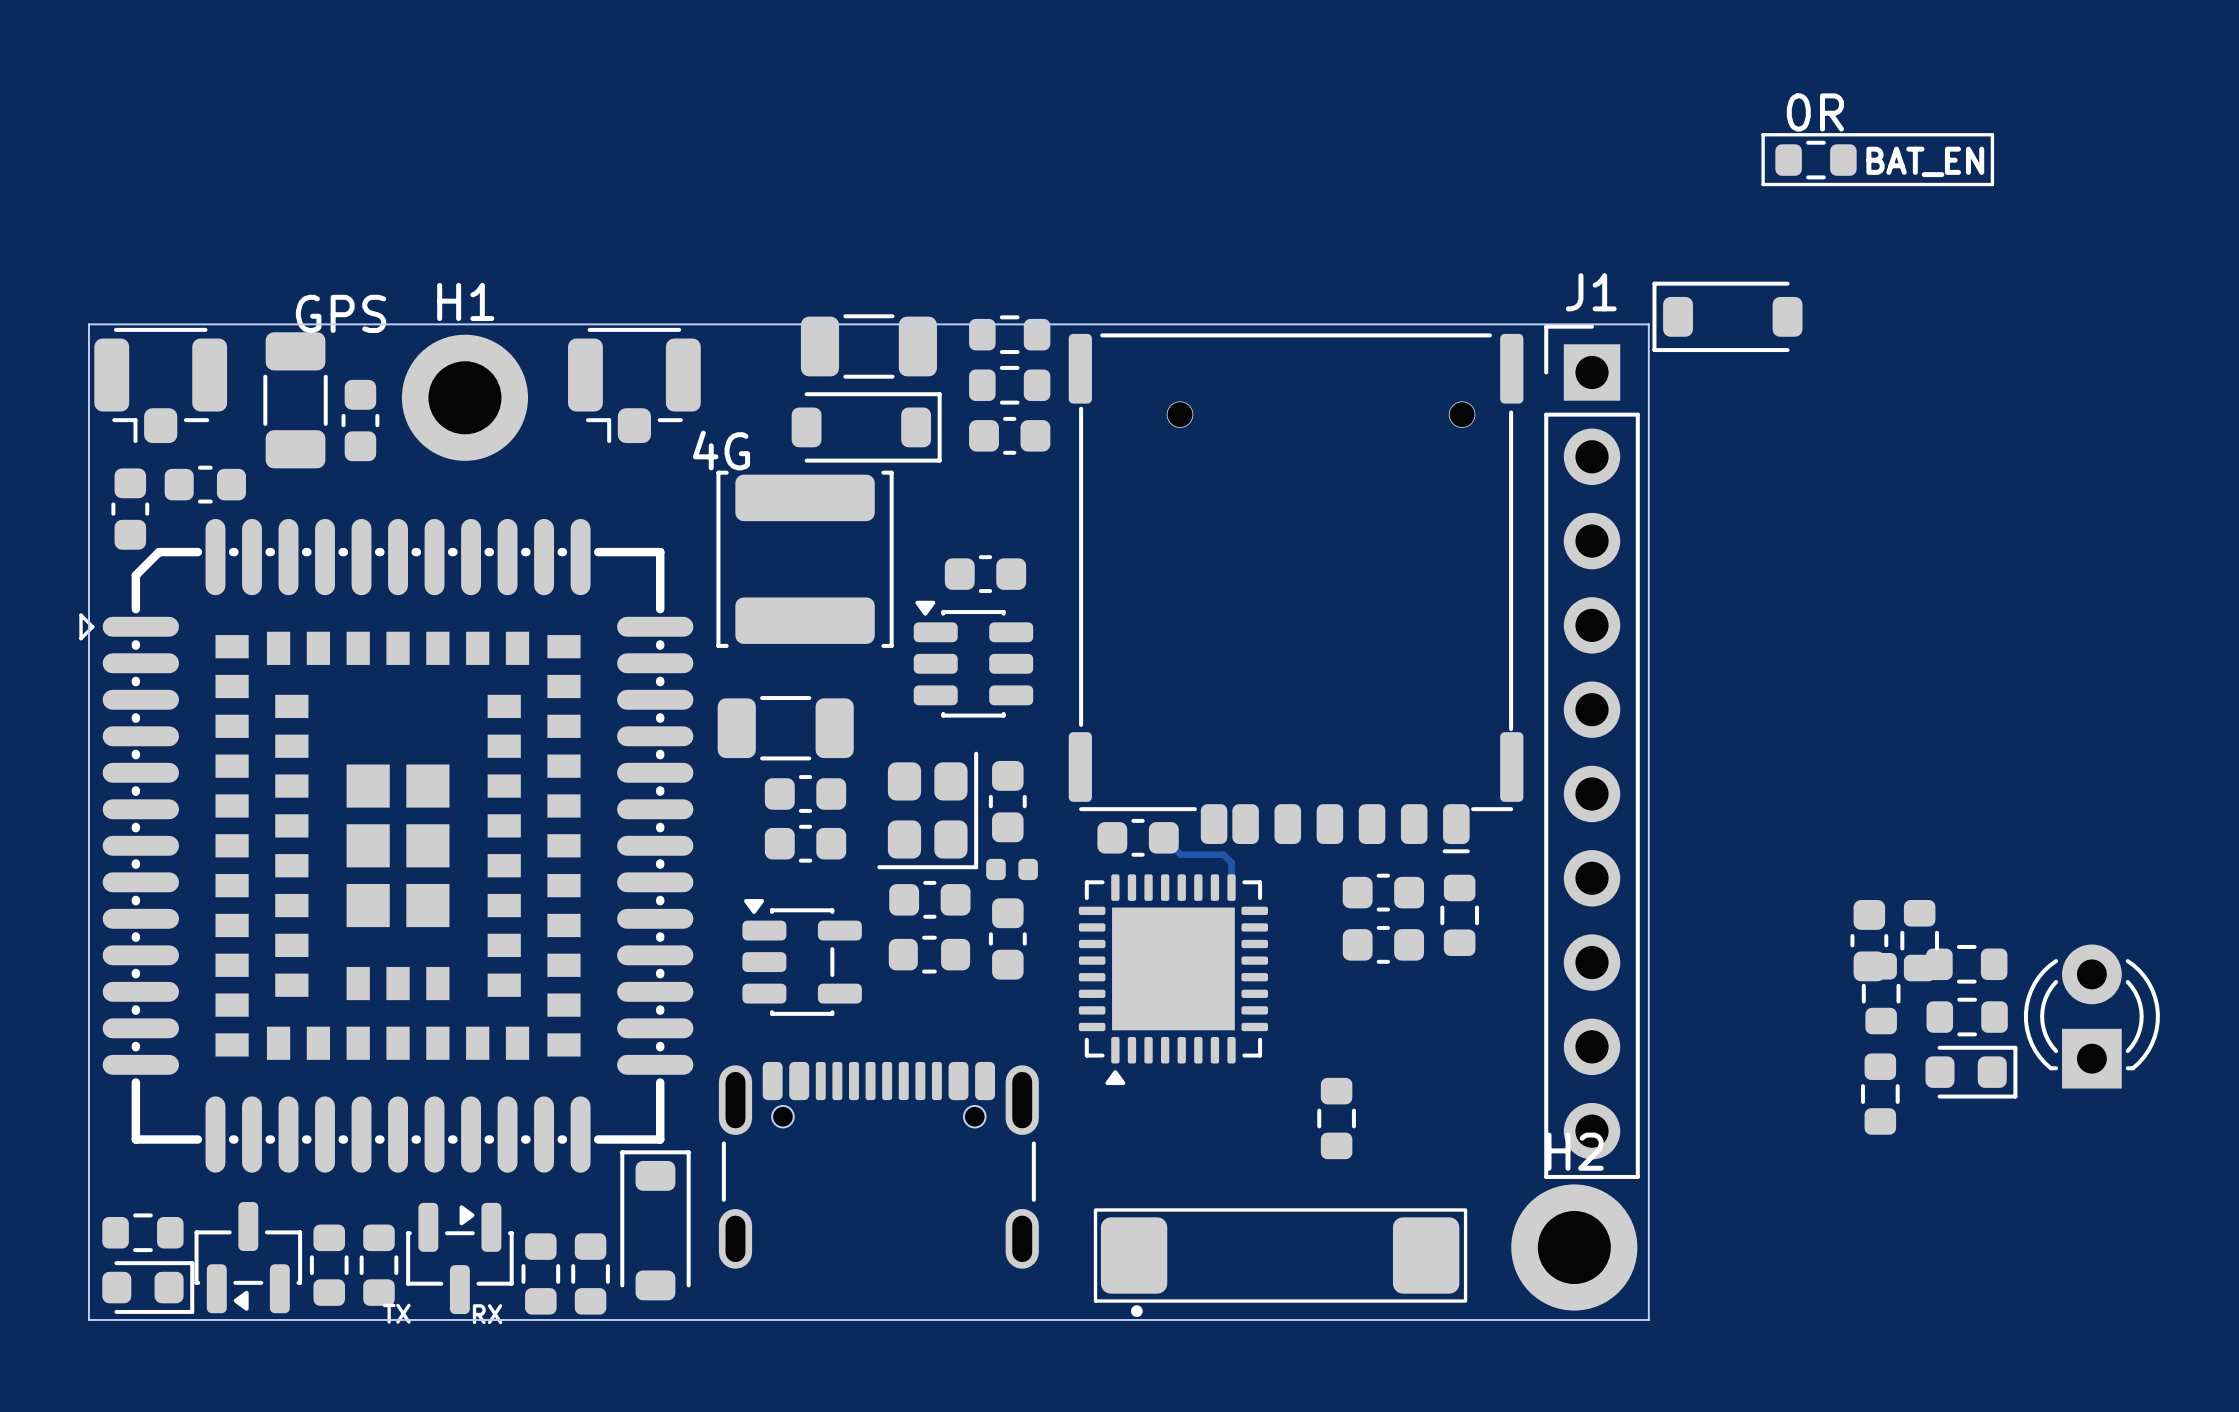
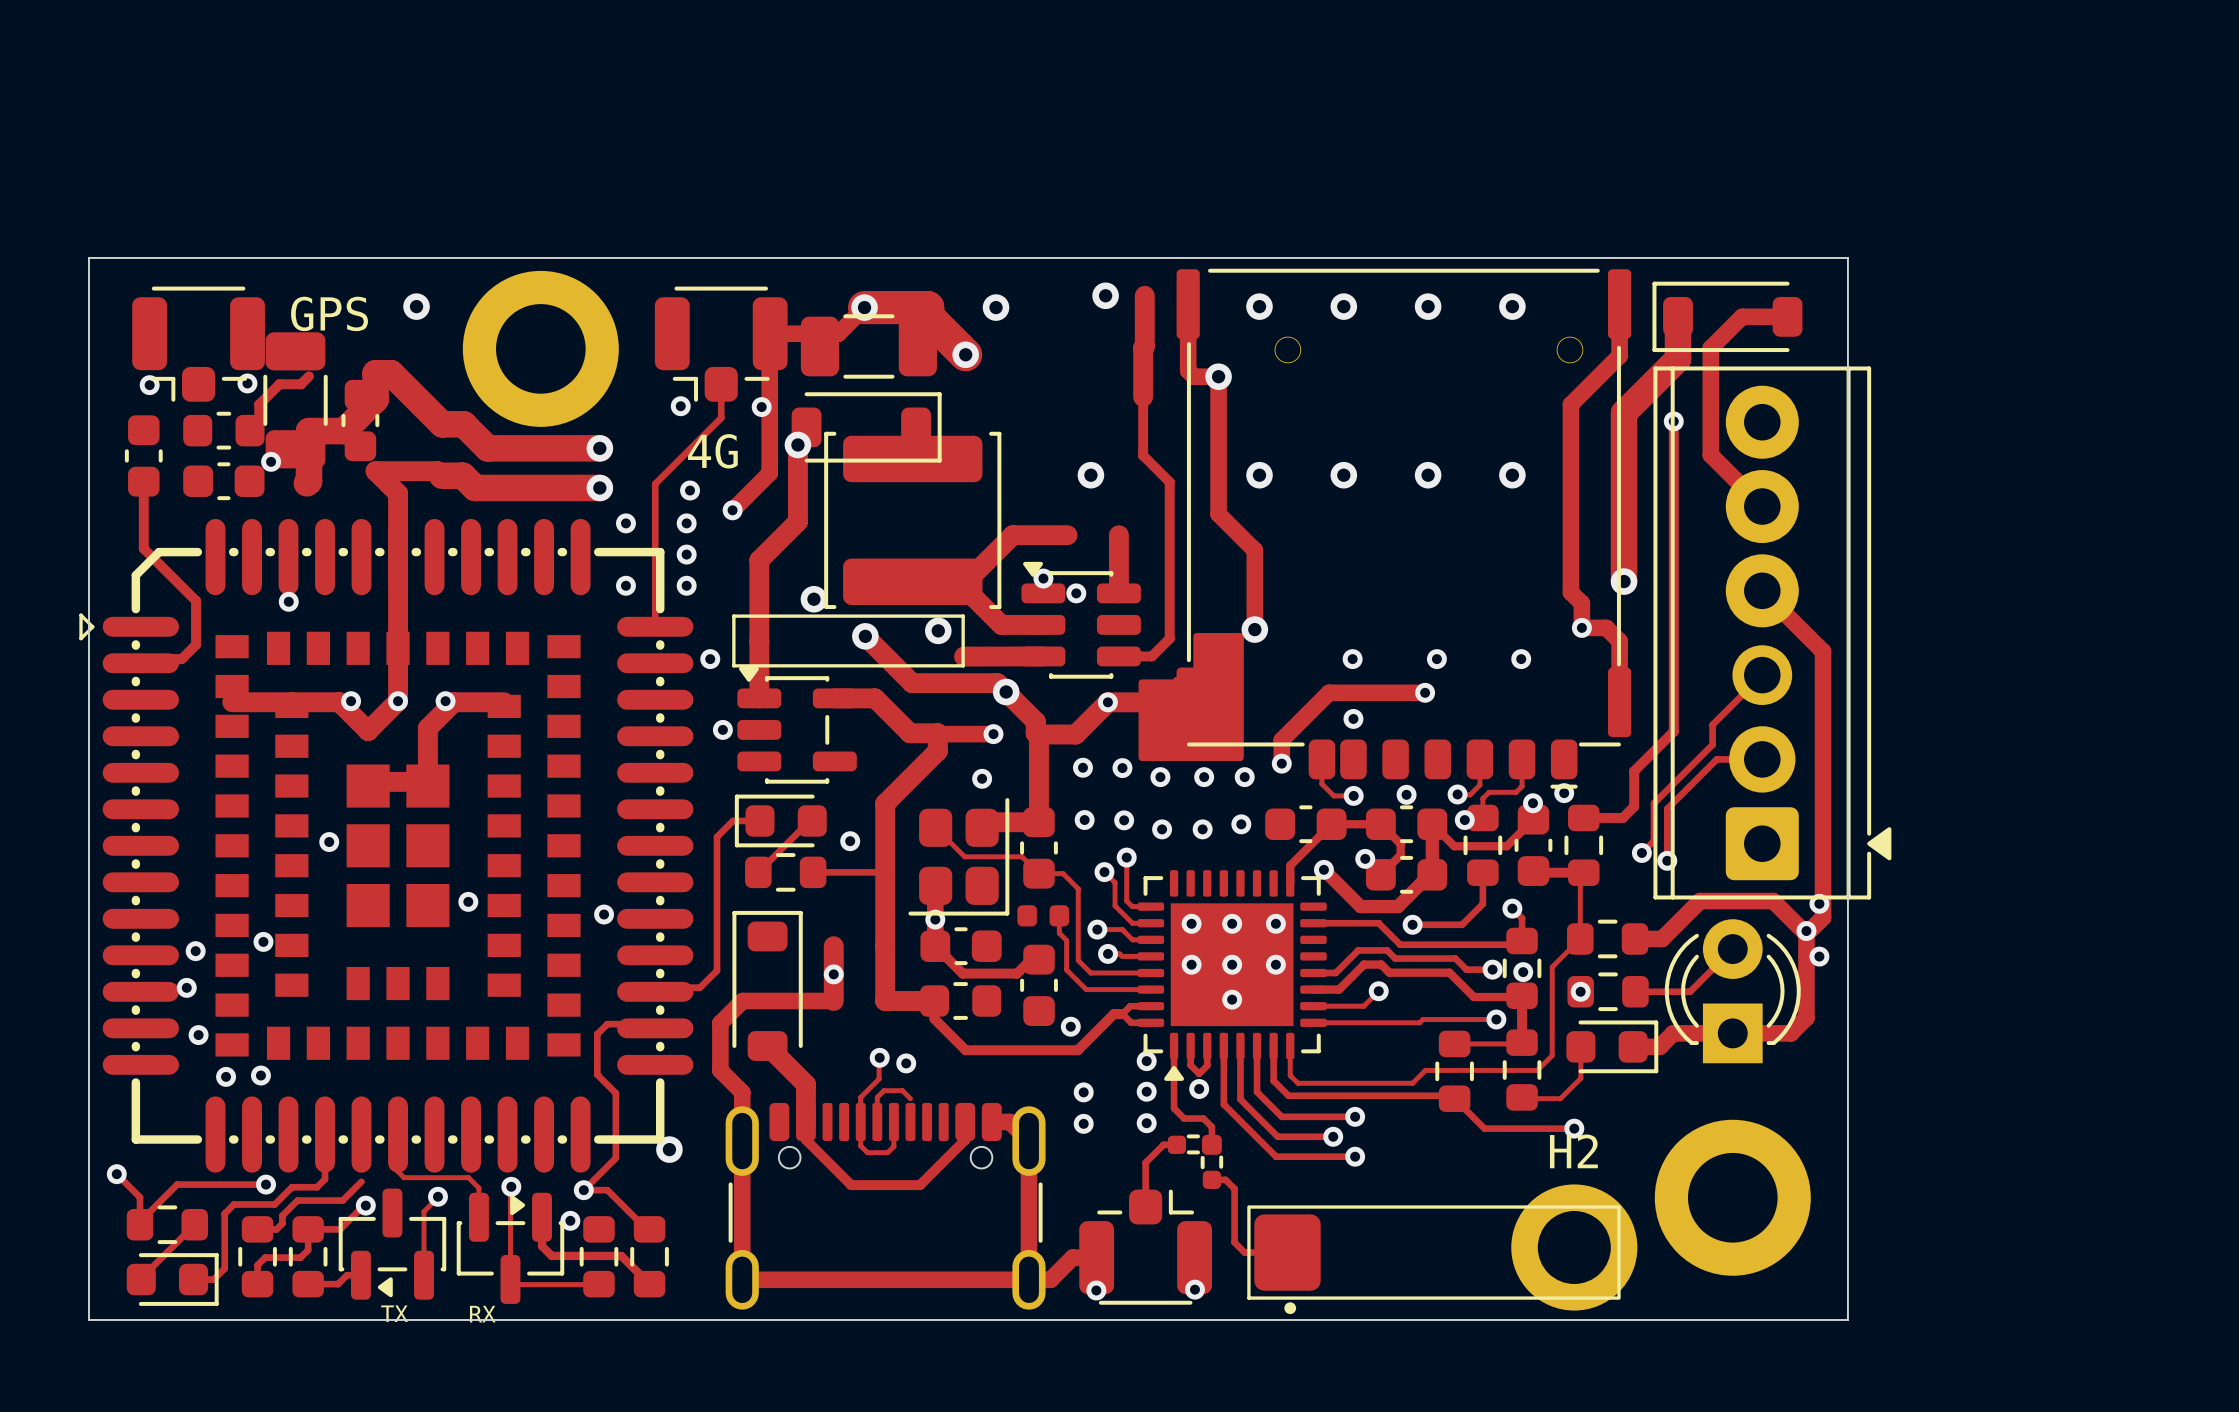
line: (1763, 134) (1992, 134) (1992, 184) (1763, 184) (1763, 134) -> none
part: 0R (1815, 160) -> none
text: BAT_EN (1925, 161) -> none
via: none -> (1105, 295)
track: none -> (1144, 295) (1143, 455) (1169, 482) (1169, 638) (1151, 656) (1118, 656)
track: none -> (1188, 304) (1188, 370) (1194, 376) (1218, 376) (1218, 514) (1254, 550) (1254, 629)
track: none -> (1619, 304) (1619, 355) (1570, 404) (1570, 592) (1581, 603) (1581, 627) (1606, 627) (1619, 641) (1619, 702)
via: none -> (416, 306)
via: none -> (1259, 306)
via: none -> (1343, 306)
via: none -> (1428, 306)
via: none -> (1512, 306)
via: none -> (864, 307)
via: none -> (996, 307)
track: none -> (1678, 316) (1678, 358) (1624, 412) (1624, 581)
track: none -> (1787, 316) (1742, 316) (1710, 348) (1710, 455) (1762, 506)
board edge: (88, 324) (1648, 324) (1648, 1319) -> (88, 324) (88, 257) (1847, 257) (1847, 1319) (1648, 1319)
part: (1009, 334) -> none
part: none -> (540, 348)
track: none -> (965, 354) (927, 316) (927, 307) (864, 307) (838, 333) (770, 333) (769, 473) (732, 510)
via: none -> (965, 354)
track: none -> (309, 376) (301, 384) (279, 384) (259, 404) (259, 421) (250, 430)
via: none -> (1218, 376)
via: none -> (247, 383)
track: none -> (721, 384) (721, 418) (655, 483) (655, 622)
via: none -> (149, 385)
part position: (160, 385) -> (198, 344)
part position: (634, 385) -> (721, 344)
part: (1009, 385) -> none
H1: (464, 397) -> none
via: none -> (680, 406)
via: none -> (761, 407)
track: none -> (1673, 421) (1673, 731) (1634, 771) (1634, 806) (1622, 817) (1601, 817)
via: none -> (1673, 421)
part: none -> (223, 430)
part: (1009, 435) -> none
track: none -> (797, 444) (797, 521) (759, 560) (759, 698)
via: none -> (797, 444)
track: none -> (599, 448) (487, 448) (463, 424) (442, 424) (391, 373) (375, 373) (375, 399) (344, 431) (309, 431) (309, 481) (306, 483)
via: none -> (599, 448)
via: none -> (271, 461)
part footprint: [164, 465, 246, 504] -> [183, 462, 265, 501]
via: none -> (1090, 475)
via: none -> (1259, 475)
via: none -> (1343, 475)
via: none -> (1428, 475)
via: none -> (1512, 475)
track: none -> (143, 481) (143, 548) (196, 600) (196, 644) (181, 659) (140, 659)
track: none -> (599, 487) (475, 487) (462, 475) (442, 475) (437, 471) (375, 471) (398, 493) (398, 701) (368, 731) (339, 702) (232, 702)
via: none -> (599, 487)
via: none -> (690, 490)
part position: (130, 509) -> (143, 455)
via: none -> (732, 510)
via: none -> (625, 523)
via: none -> (686, 523)
track: none -> (1067, 535) (1012, 535) (966, 581) (912, 581)
track: none -> (1118, 535) (1118, 593)
via: none -> (686, 554)
part position: (805, 559) -> (912, 520)
part: (985, 574) -> none
via: none -> (1043, 578)
track: none -> (958, 581) (1001, 624) (1043, 624)
via: none -> (1624, 581)
via: none -> (625, 585)
via: none -> (686, 585)
track: none -> (1762, 590) (1823, 651) (1823, 917) (1806, 934)
via: none -> (1076, 593)
part position: (1296, 593) -> (1403, 528)
via: none -> (813, 599)
via: none -> (288, 601)
line: none -> (733, 616) (963, 616) (963, 665) (733, 665) (733, 616)
via: none -> (1581, 627)
via: none -> (1254, 629)
via: none -> (938, 630)
part: none -> (1772, 632)
drawing: none -> [1138, 633, 1244, 762]
track: none -> (865, 636) (912, 683) (997, 683) (1035, 721) (1035, 733) (1038, 736) (1038, 822) (988, 822) (982, 827)
via: none -> (865, 636)
track: none -> (964, 656) (1043, 656)
via: none -> (710, 659)
part position: (973, 659) -> (1081, 620)
via: none -> (1352, 659)
via: none -> (1436, 659)
via: none -> (1521, 659)
track: none -> (1762, 675) (1712, 724) (1712, 744) (1653, 803) (1653, 840) (1641, 852)
via: none -> (1006, 691)
track: none -> (1425, 692) (1329, 692) (1281, 740) (1281, 763)
via: none -> (1425, 692)
part footprint: [717, 696, 854, 761] -> [737, 666, 857, 784]
track: none -> (834, 698) (875, 698) (910, 733) (937, 733)
via: none -> (351, 701)
via: none -> (398, 701)
via: none -> (445, 701)
track: none -> (504, 702) (453, 702) (427, 728) (427, 781) (368, 781)
via: none -> (1107, 702)
track: none -> (1188, 702) (1107, 702) (1075, 734) (1036, 734)
via: none -> (1353, 718)
via: none -> (722, 729)
track: none -> (937, 733) (937, 751) (885, 803) (885, 1000) (934, 1000) (934, 1019) (965, 1050) (1077, 1050) (1114, 1013) (1122, 1013)
track: none -> (937, 733) (993, 734)
via: none -> (993, 734)
J1: (1592, 751) -> none
track: none -> (1321, 759) (1321, 783) (1333, 795) (1353, 795)
track: none -> (1479, 759) (1479, 785) (1470, 794) (1458, 794)
track: none -> (1522, 759) (1522, 786) (1516, 792) (1489, 792) (1482, 798) (1482, 817) (1479, 820) (1464, 820)
track: none -> (1762, 759) (1716, 759) (1667, 808) (1667, 860)
via: none -> (1281, 763)
via: none -> (1082, 767)
via: none -> (1122, 768)
via: none -> (1160, 777)
via: none -> (1204, 777)
via: none -> (1244, 777)
via: none -> (982, 778)
part: (805, 793) -> none
via: none -> (1564, 793)
via: none -> (1406, 794)
via: none -> (1457, 794)
via: none -> (1353, 795)
part: (1007, 801) -> none
track: none -> (1533, 803) (1533, 819) (1506, 846) (1454, 846) (1432, 824) (1432, 874) (1429, 874) (1397, 906) (1360, 906) (1323, 869)
via: none -> (1533, 803)
part position: (927, 810) -> (958, 856)
track: none -> (760, 820) (733, 820) (717, 836) (717, 970) (700, 987) (655, 987)
part: none -> (780, 820)
track: none -> (812, 820) (809, 820) (758, 872)
via: none -> (1084, 820)
via: none -> (1124, 820)
via: none -> (1464, 820)
via: none -> (1241, 824)
part: none -> (1305, 824)
part: none -> (1406, 824)
track: none -> (935, 827) (964, 856) (1022, 856) (1038, 873) (1063, 873) (1078, 888) (1078, 960) (1090, 973) (1150, 973)
via: none -> (1162, 829)
via: none -> (1202, 829)
part: (1138, 837) -> none
track: (1163, 837) (1180, 854) (1223, 854) (1231, 862) (1231, 887) -> none
via: none -> (850, 841)
via: none -> (329, 842)
part: (805, 843) -> none
part: none -> (1482, 845)
part: none -> (1533, 845)
part: none -> (1583, 845)
part: none -> (1038, 847)
via: none -> (1641, 852)
track: none -> (1126, 857) (1126, 901) (1132, 906) (1150, 906)
via: none -> (1126, 857)
via: none -> (1365, 858)
via: none -> (1667, 860)
part position: (1012, 869) -> (1043, 915)
via: none -> (1323, 869)
track: none -> (1533, 871) (1535, 872) (1583, 872) (1580, 876) (1580, 938) (1552, 967) (1552, 1055) (1537, 1070) (1425, 1070) (1412, 1083) (1297, 1083) (1290, 1075) (1290, 1046)
part: none -> (785, 872)
track: none -> (813, 872) (885, 872)
track: none -> (1104, 872) (1115, 882) (1115, 905) (1132, 923) (1150, 923)
via: none -> (1104, 872)
track: none -> (1482, 872) (1482, 903) (1462, 924) (1412, 924)
track: none -> (1380, 874) (1400, 855) (1400, 844) (1380, 824) (1331, 824) (1290, 865) (1290, 883)
track: none -> (935, 886) (935, 946) (962, 973) (1017, 973) (1031, 959) (1039, 959)
part position: (1383, 892) -> (1406, 874)
part: (929, 899) -> none
via: none -> (468, 901)
via: none -> (1819, 903)
track: none -> (1512, 908) (1522, 918) (1522, 940) (1518, 944) (1400, 944) (1378, 923) (1313, 923)
via: none -> (1512, 908)
via: none -> (604, 914)
track: none -> (1059, 915) (1059, 933) (1066, 940) (1066, 969) (1086, 989) (1150, 989)
part: (1459, 915) -> none
via: none -> (935, 919)
via: none -> (1191, 923)
via: none -> (1232, 923)
via: none -> (1275, 923)
via: none -> (1412, 924)
track: none -> (1097, 929) (1122, 929) (1132, 939) (1150, 939)
via: none -> (1097, 929)
via: none -> (1806, 931)
track: none -> (1806, 934) (1773, 901) (1700, 901) (1662, 938) (1635, 938)
track: none -> (1806, 934) (1806, 1017) (1790, 1033) (1673, 1033) (1659, 1046) (1633, 1046)
part: (1007, 938) -> none
part: none -> (1607, 938)
part: (1869, 940) -> none
part: (1919, 940) -> none
via: none -> (263, 941)
part: (1383, 944) -> none
track: none -> (833, 946) (833, 1000) (742, 1000) (720, 1023) (720, 1070) (742, 1092) (742, 1279) (1050, 1279) (1072, 1257) (1096, 1257) (1096, 1290)
part: none -> (961, 946)
track: none -> (1732, 949) (1690, 991) (1635, 991)
via: none -> (195, 951)
track: none -> (1108, 953) (1119, 953) (1122, 956) (1150, 956)
via: none -> (1108, 953)
part position: (929, 954) -> (960, 1000)
via: none -> (1819, 956)
part: (802, 957) -> none
via: none -> (1191, 964)
via: none -> (1232, 964)
via: none -> (1275, 964)
part: (1966, 964) -> none
part: none -> (1522, 968)
track: none -> (1492, 969) (1466, 969) (1455, 958) (1395, 958) (1387, 950) (1358, 950) (1335, 973) (1313, 973)
via: none -> (1492, 969)
via: none -> (1523, 972)
via: none -> (833, 974)
part position: (1173, 979) -> (1232, 975)
part: none -> (1039, 985)
via: none -> (186, 987)
track: none -> (1313, 989) (1339, 989) (1364, 964) (1381, 964) (1389, 972) (1449, 972) (1473, 997) (1522, 995) (1520, 1043) (1454, 1043)
track: none -> (1378, 991) (1363, 1006) (1313, 1006)
via: none -> (1378, 991)
via: none -> (1580, 991)
part: none -> (1608, 991)
part: (1881, 993) -> none
via: none -> (1232, 999)
track: none -> (1150, 1006) (1130, 1006) (1122, 1013)
track: none -> (1122, 1013) (1131, 1022) (1150, 1022)
part position: (2091, 1016) -> (1732, 991)
part: (1967, 1017) -> none
track: none -> (1496, 1019) (1422, 1019) (1419, 1022) (1313, 1022)
via: none -> (1496, 1019)
track: none -> (655, 1024) (607, 1024) (597, 1034) (597, 1074) (615, 1093) (615, 1158) (583, 1190) (607, 1190) (646, 1229) (649, 1229)
via: none -> (1070, 1026)
via: none -> (198, 1035)
track: none -> (767, 1045) (805, 1084) (805, 1139) (851, 1185) (919, 1185) (965, 1139) (965, 1121)
track: none -> (1174, 1046) (1174, 1108) (1184, 1118) (1203, 1118) (1211, 1127) (1211, 1144)
track: none -> (1190, 1046) (1190, 1065) (1199, 1073) (1207, 1065) (1207, 1046)
track: none -> (1223, 1046) (1223, 1104) (1276, 1156) (1355, 1156)
track: none -> (1240, 1046) (1240, 1099) (1277, 1136) (1333, 1136)
track: none -> (1257, 1046) (1257, 1092) (1281, 1116) (1355, 1116)
track: none -> (1273, 1046) (1273, 1080) (1288, 1095) (1451, 1095) (1484, 1128) (1574, 1128)
track: none -> (1580, 1046) (1580, 1078) (1560, 1098) (1512, 1098)
track: none -> (879, 1057) (879, 1079) (860, 1097) (860, 1145) (867, 1152) (887, 1152) (893, 1146) (893, 1121)
via: none -> (879, 1057)
via: none -> (1146, 1061)
via: none -> (906, 1063)
part: none -> (1522, 1070)
part: none -> (1454, 1071)
part position: (1971, 1072) -> (1612, 1046)
via: none -> (260, 1075)
via: none -> (226, 1076)
via: none -> (1199, 1089)
via: none -> (1146, 1091)
via: none -> (1083, 1092)
part: (1880, 1094) -> none
track: none -> (910, 1098) (902, 1090) (883, 1090) (877, 1097) (877, 1121)
via: none -> (1355, 1116)
part: (1336, 1118) -> none
track: none -> (991, 1121) (1009, 1121) (1028, 1141) (1028, 1279)
via: none -> (1083, 1123)
via: none -> (1146, 1123)
via: none -> (1574, 1128)
track: none -> (325, 1130) (325, 1179) (317, 1187) (292, 1187) (274, 1204) (233, 1204) (224, 1213) (224, 1268) (213, 1279) (193, 1279)
track: none -> (398, 1130) (398, 1171) (404, 1177) (468, 1177) (478, 1188) (478, 1217)
via: none -> (1333, 1136)
track: none -> (1176, 1144) (1163, 1144) (1145, 1162) (1145, 1207)
via: none -> (669, 1149)
via: none -> (1355, 1156)
part: none -> (1195, 1161)
part position: (878, 1165) -> (885, 1206)
track: none -> (116, 1174) (140, 1197) (140, 1224)
via: none -> (116, 1174)
track: none -> (1211, 1179) (1225, 1179) (1234, 1188) (1234, 1242) (1244, 1252) (1287, 1252)
track: none -> (361, 1181) (342, 1200) (297, 1200) (282, 1215) (282, 1223) (276, 1229) (257, 1229)
track: none -> (266, 1184) (177, 1184) (140, 1221)
via: none -> (266, 1184)
track: none -> (511, 1186) (510, 1279) (515, 1284) (598, 1284)
via: none -> (511, 1186)
via: none -> (583, 1190)
track: none -> (437, 1196) (423, 1211) (423, 1275)
via: none -> (437, 1196)
part: none -> (1732, 1197)
part footprint: [194, 1202, 303, 1314] -> [238, 1216, 277, 1298]
track: none -> (365, 1205) (340, 1229) (308, 1229) (308, 1250) (300, 1257) (265, 1257) (257, 1265) (257, 1284)
via: none -> (365, 1205)
track: none -> (542, 1217) (542, 1246) (551, 1255) (621, 1255) (649, 1284)
via: none -> (570, 1220)
track: none -> (194, 1224) (141, 1279)
part footprint: [359, 1224, 399, 1306] -> [338, 1188, 447, 1300]
part position: (655, 1225) -> (767, 985)
part position: (142, 1232) -> (167, 1224)
part: none -> (1145, 1247)
part position: (459, 1258) -> (510, 1248)
part position: (1280, 1262) -> (1433, 1259)
part position: (329, 1265) -> (308, 1256)
part position: (540, 1273) -> (649, 1256)
part position: (590, 1273) -> (598, 1256)
track: none -> (360, 1275) (347, 1275) (338, 1284) (308, 1284)
part position: (148, 1287) -> (172, 1279)
via: none -> (1194, 1289)
via: none -> (1096, 1290)

